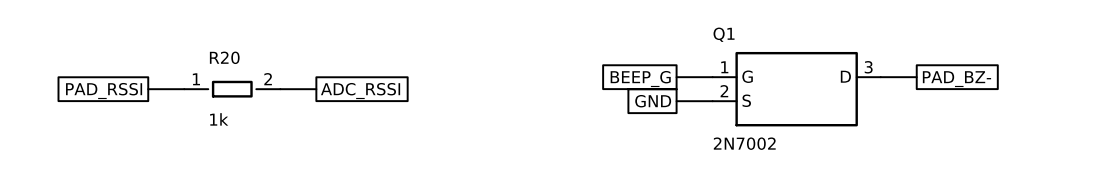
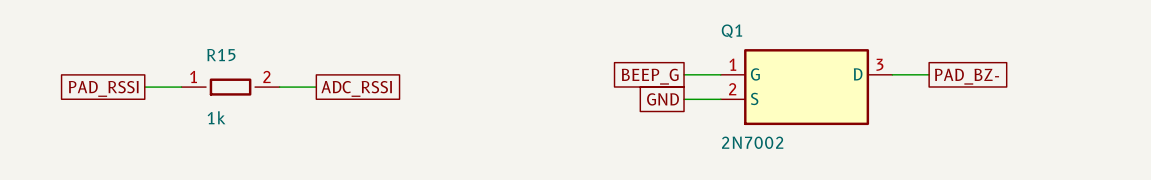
R20 name: R20 (224, 57) -> R15 (221, 55)

